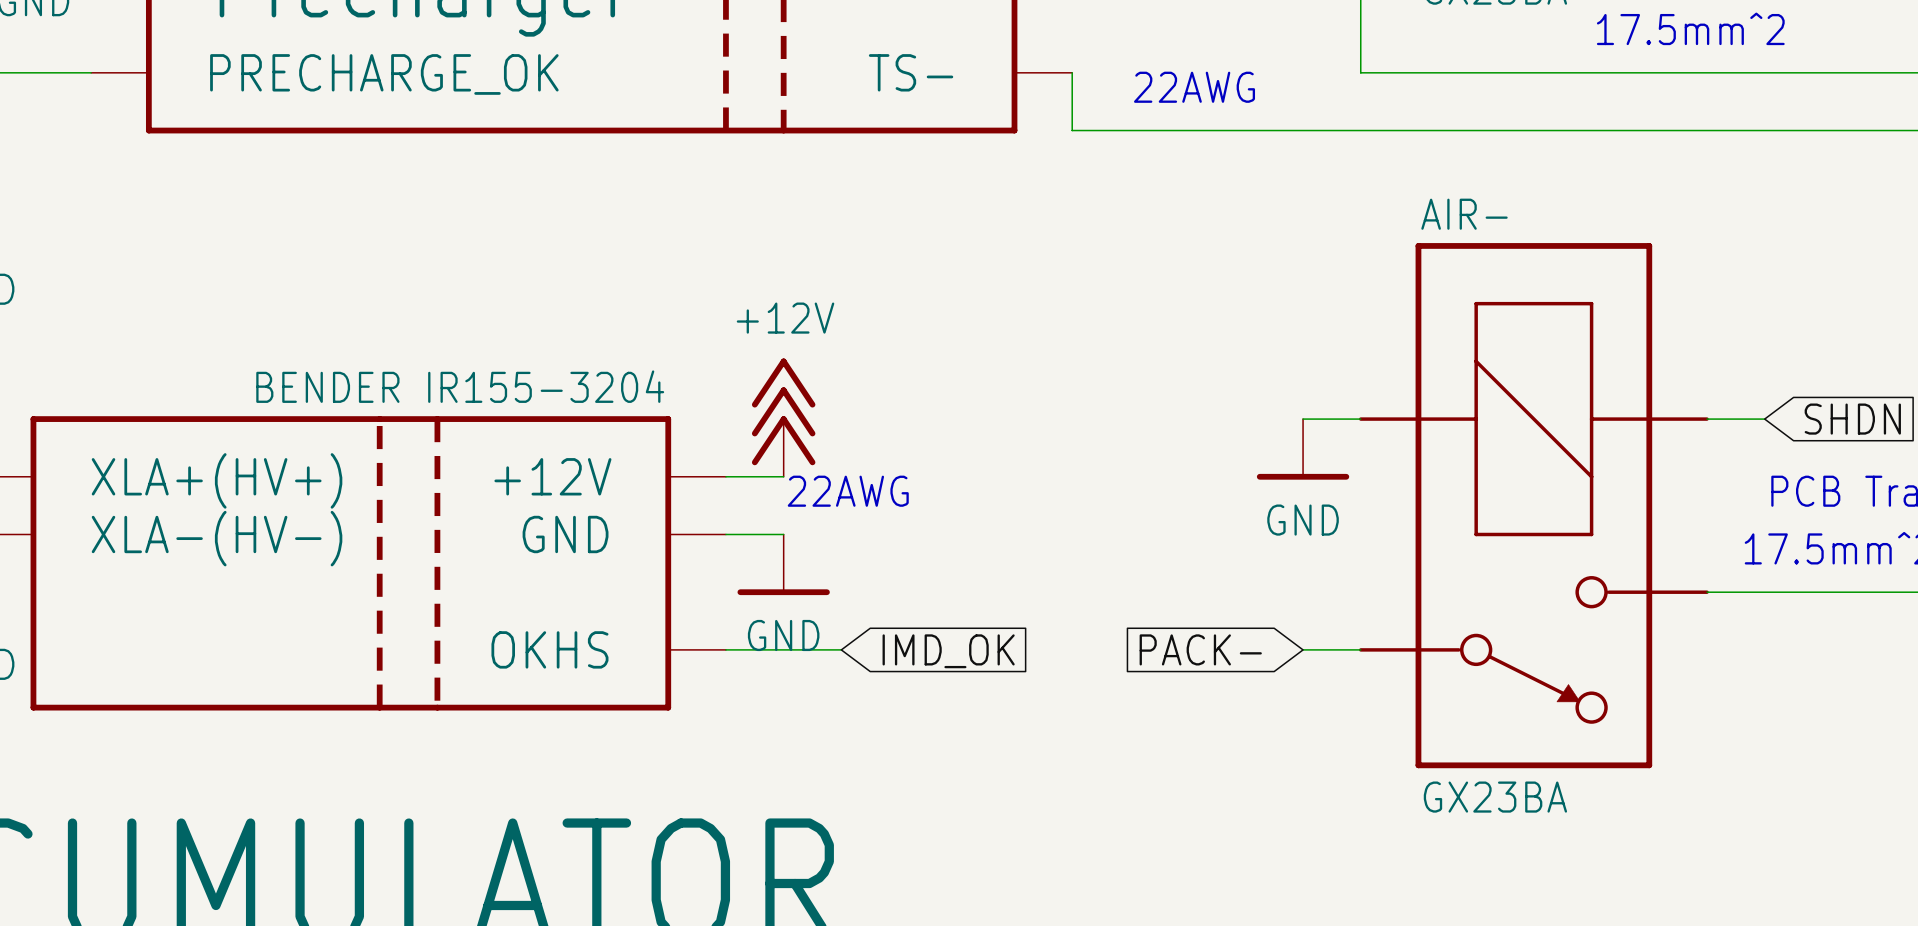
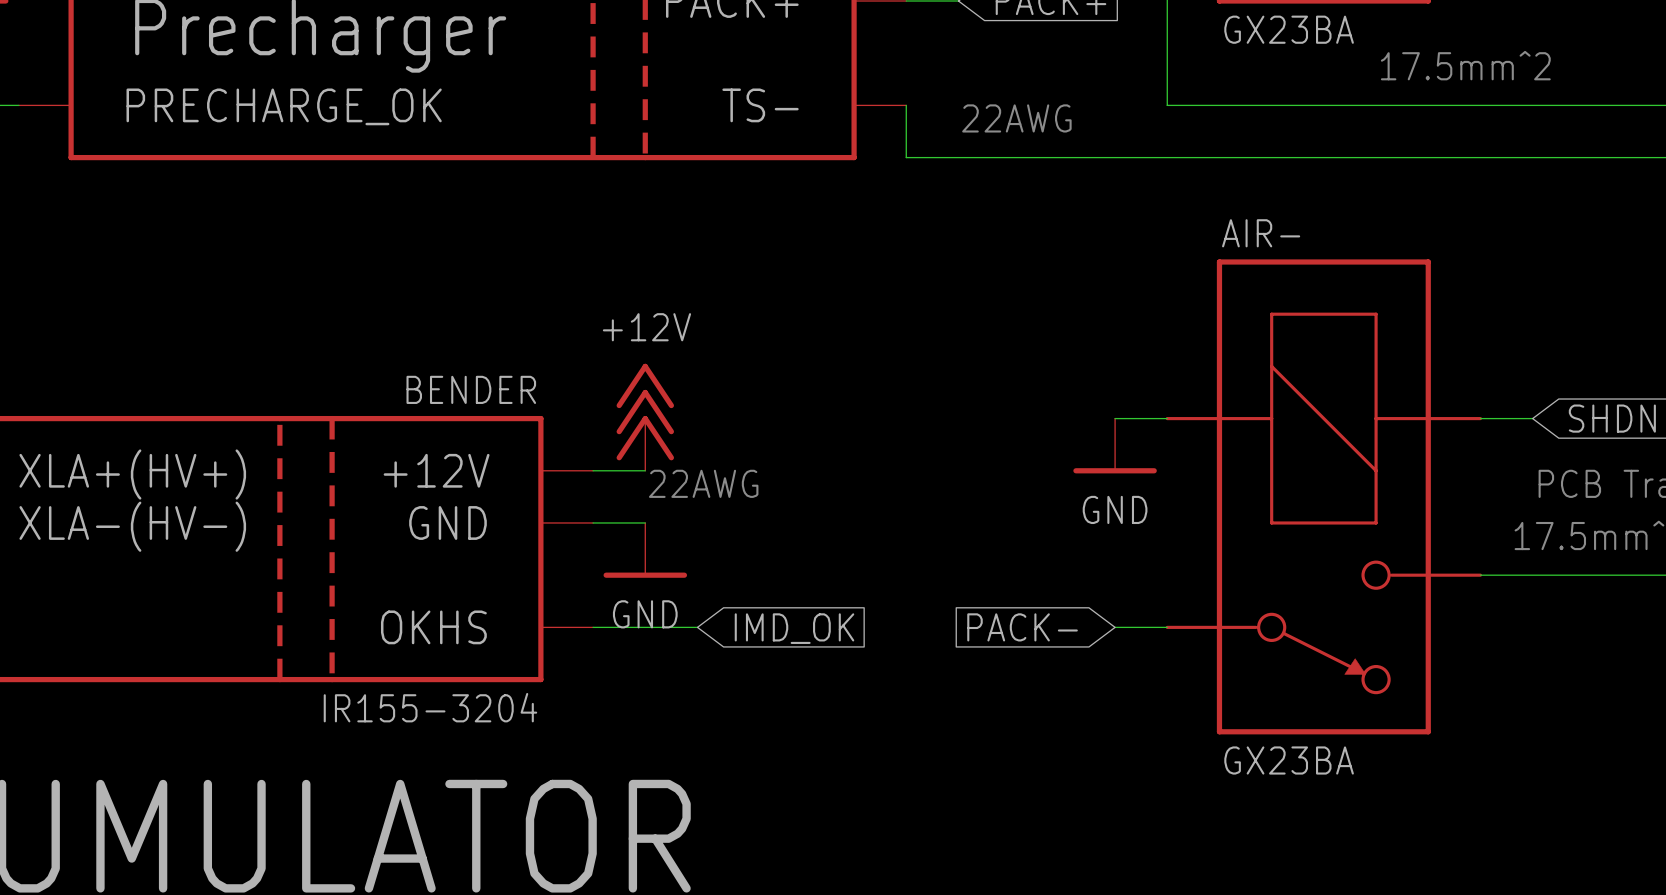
part text: BENDER IR155-3204 (460, 386) -> BENDER (471, 389)
part text: none -> IR155-3204 (430, 707)

